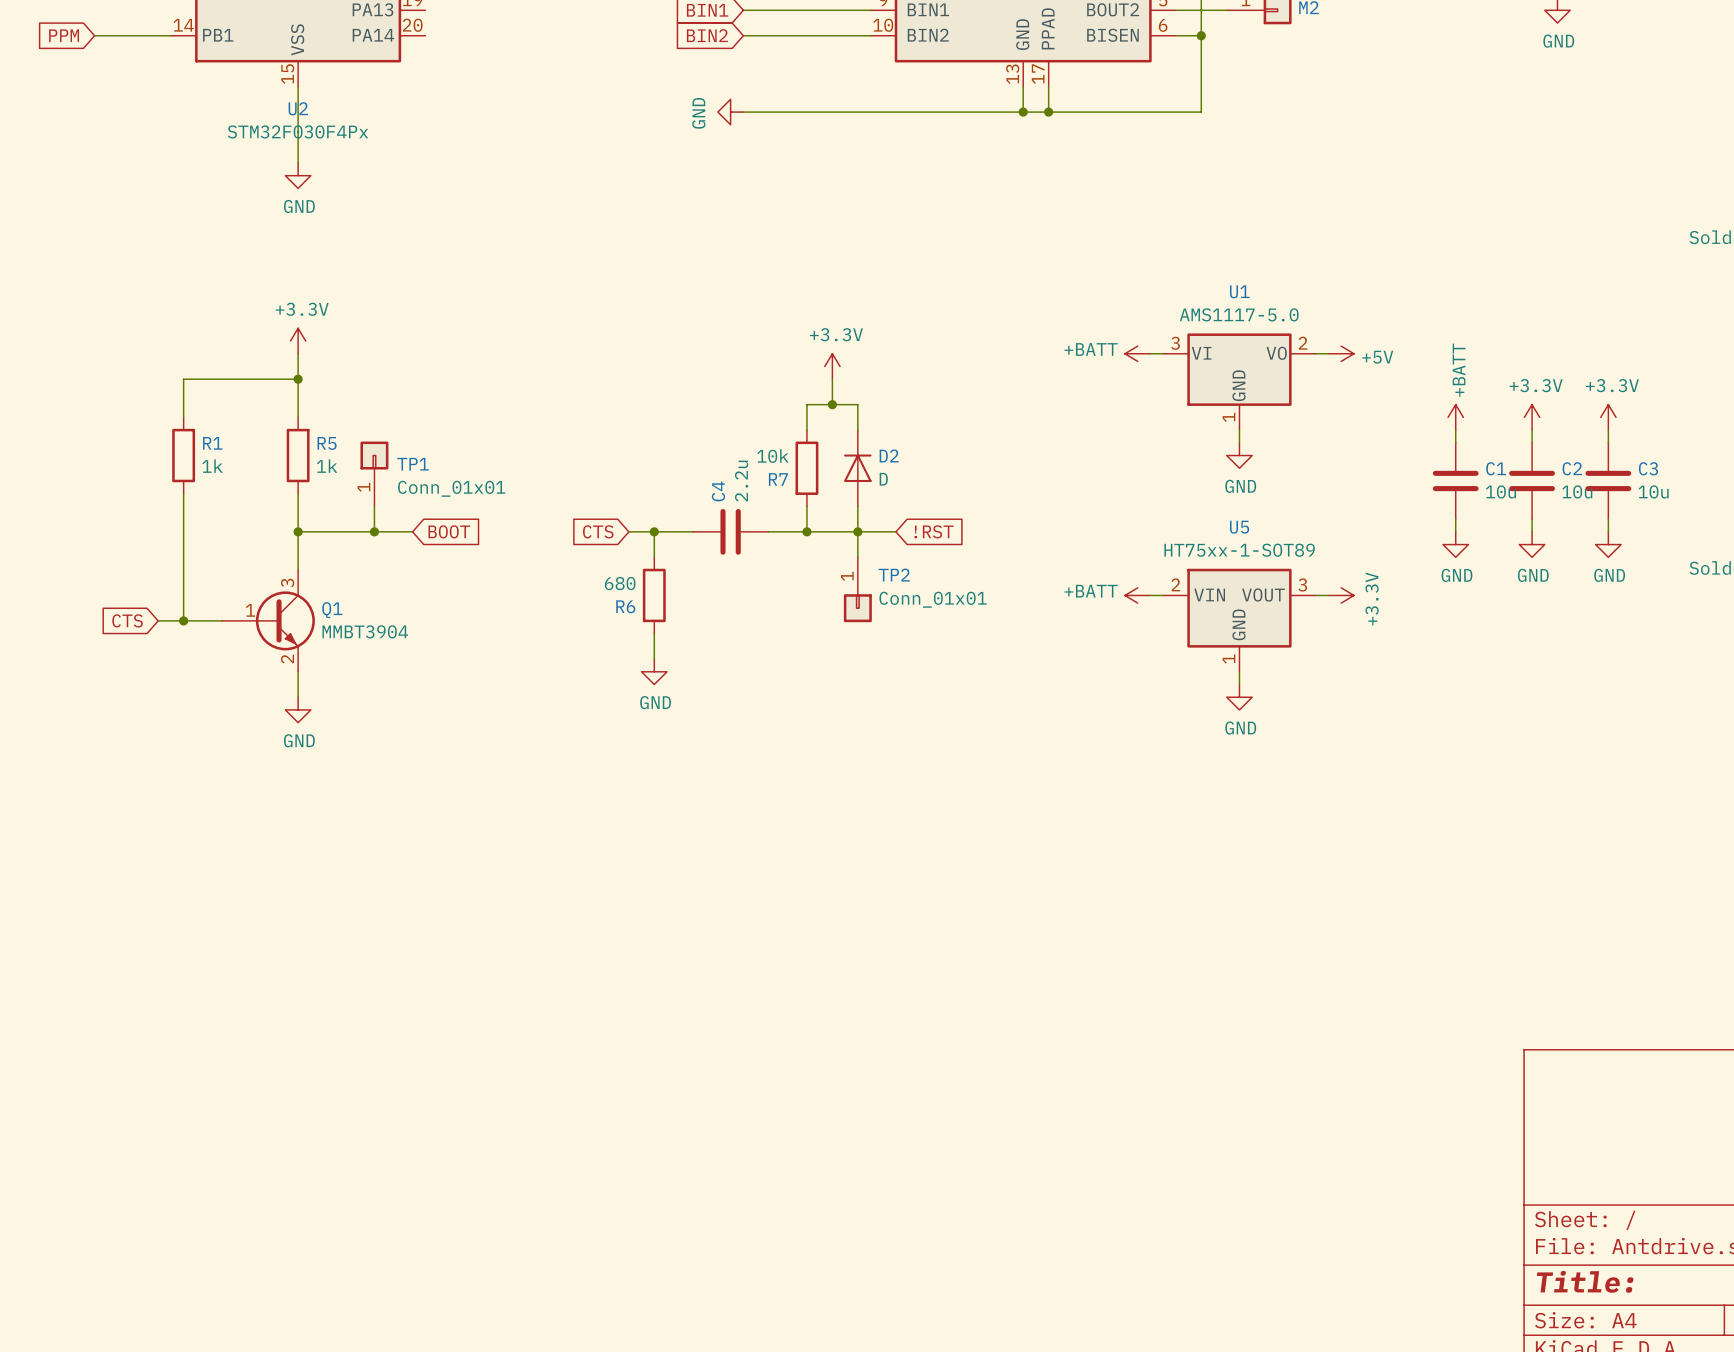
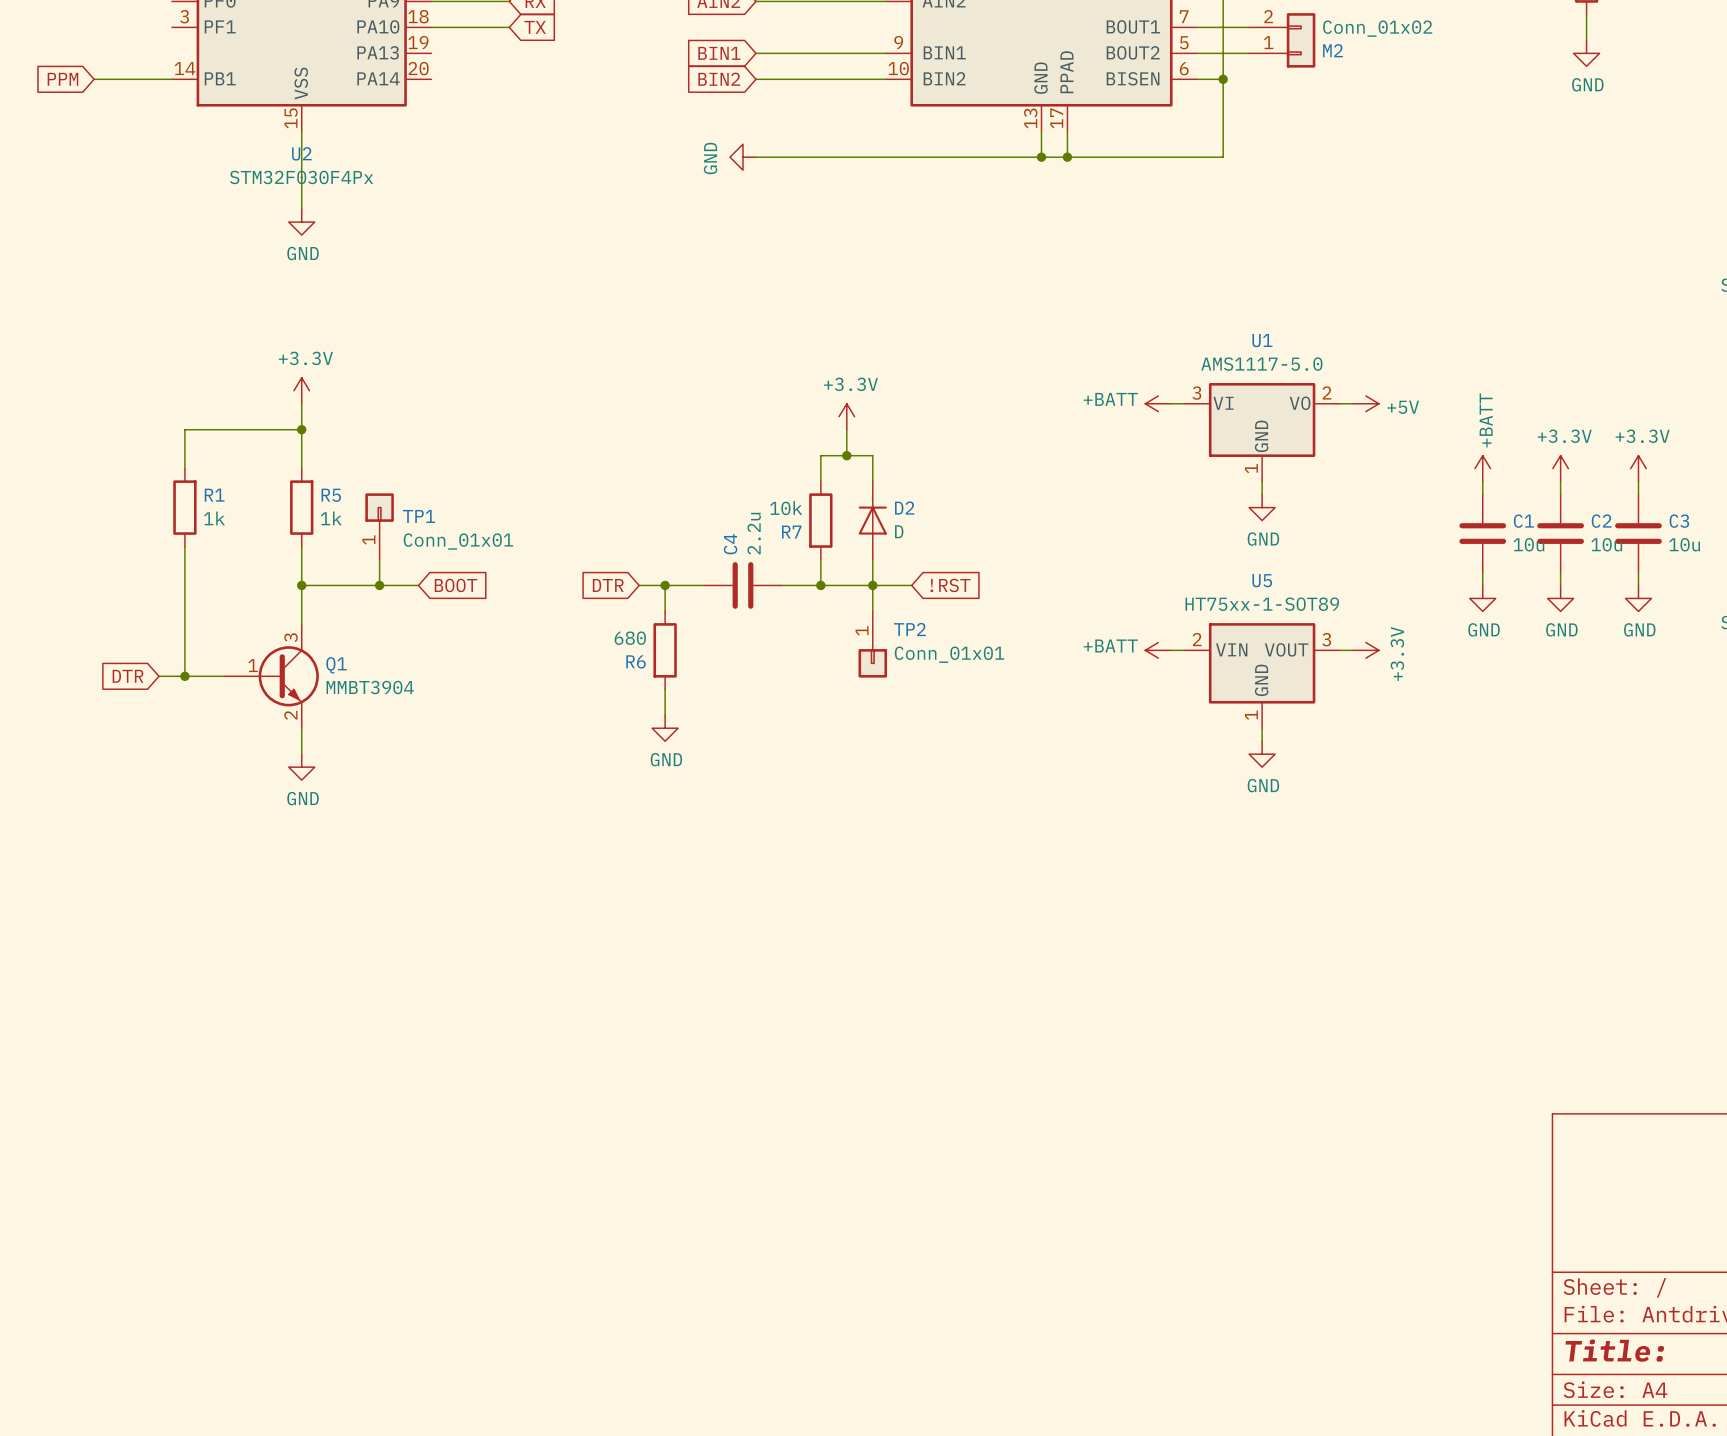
global label: CTS (598, 531) -> DTR (608, 585)
global label: CTS (127, 620) -> DTR (128, 676)

